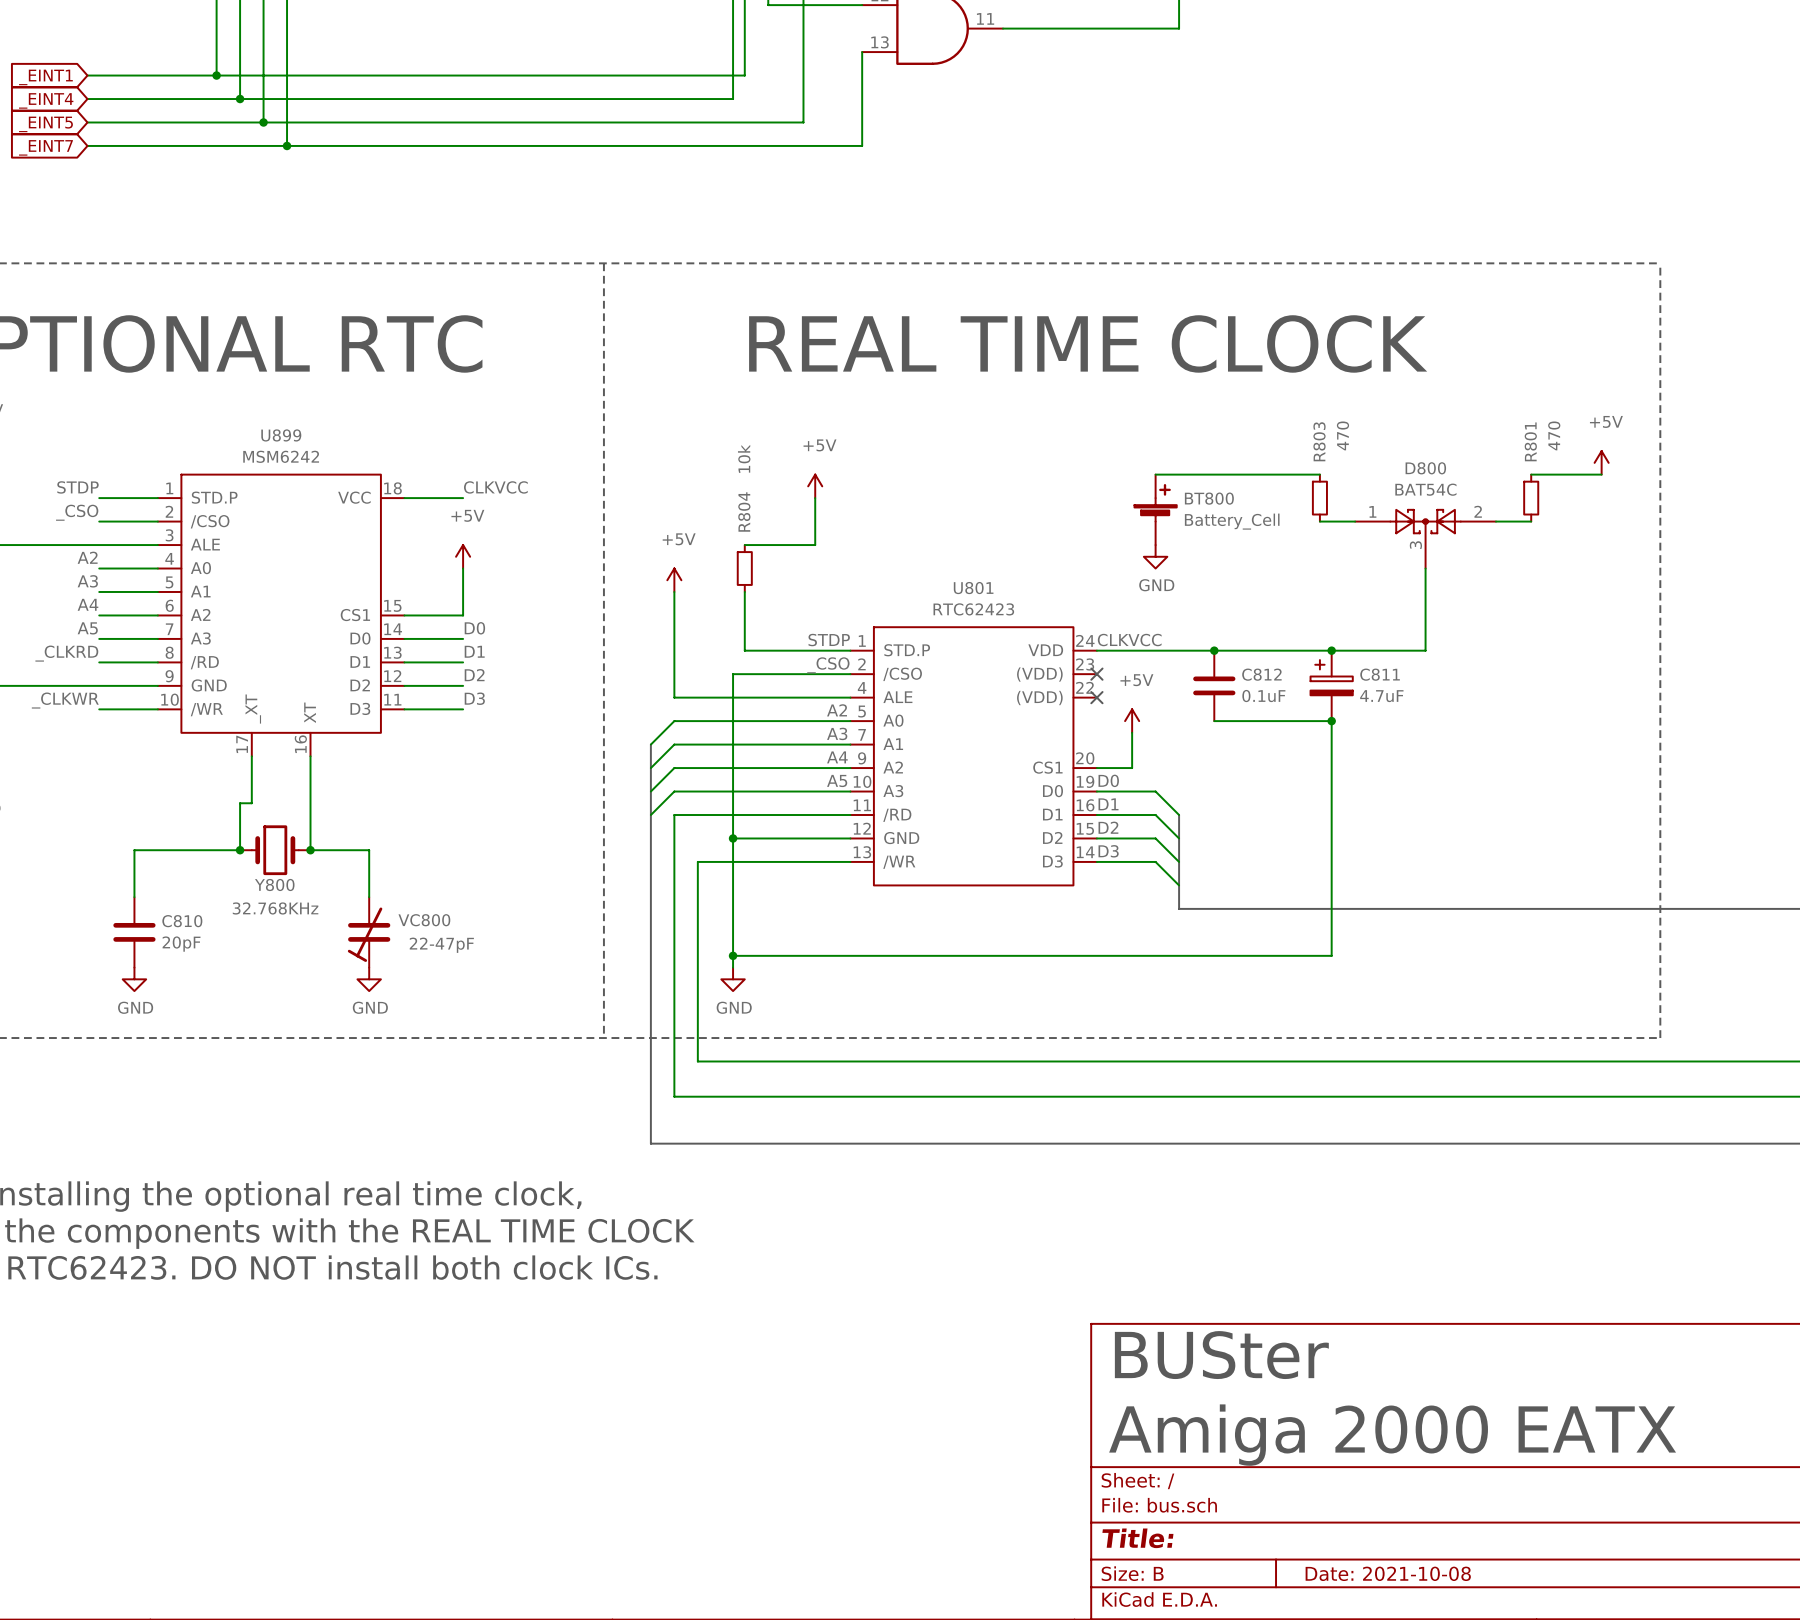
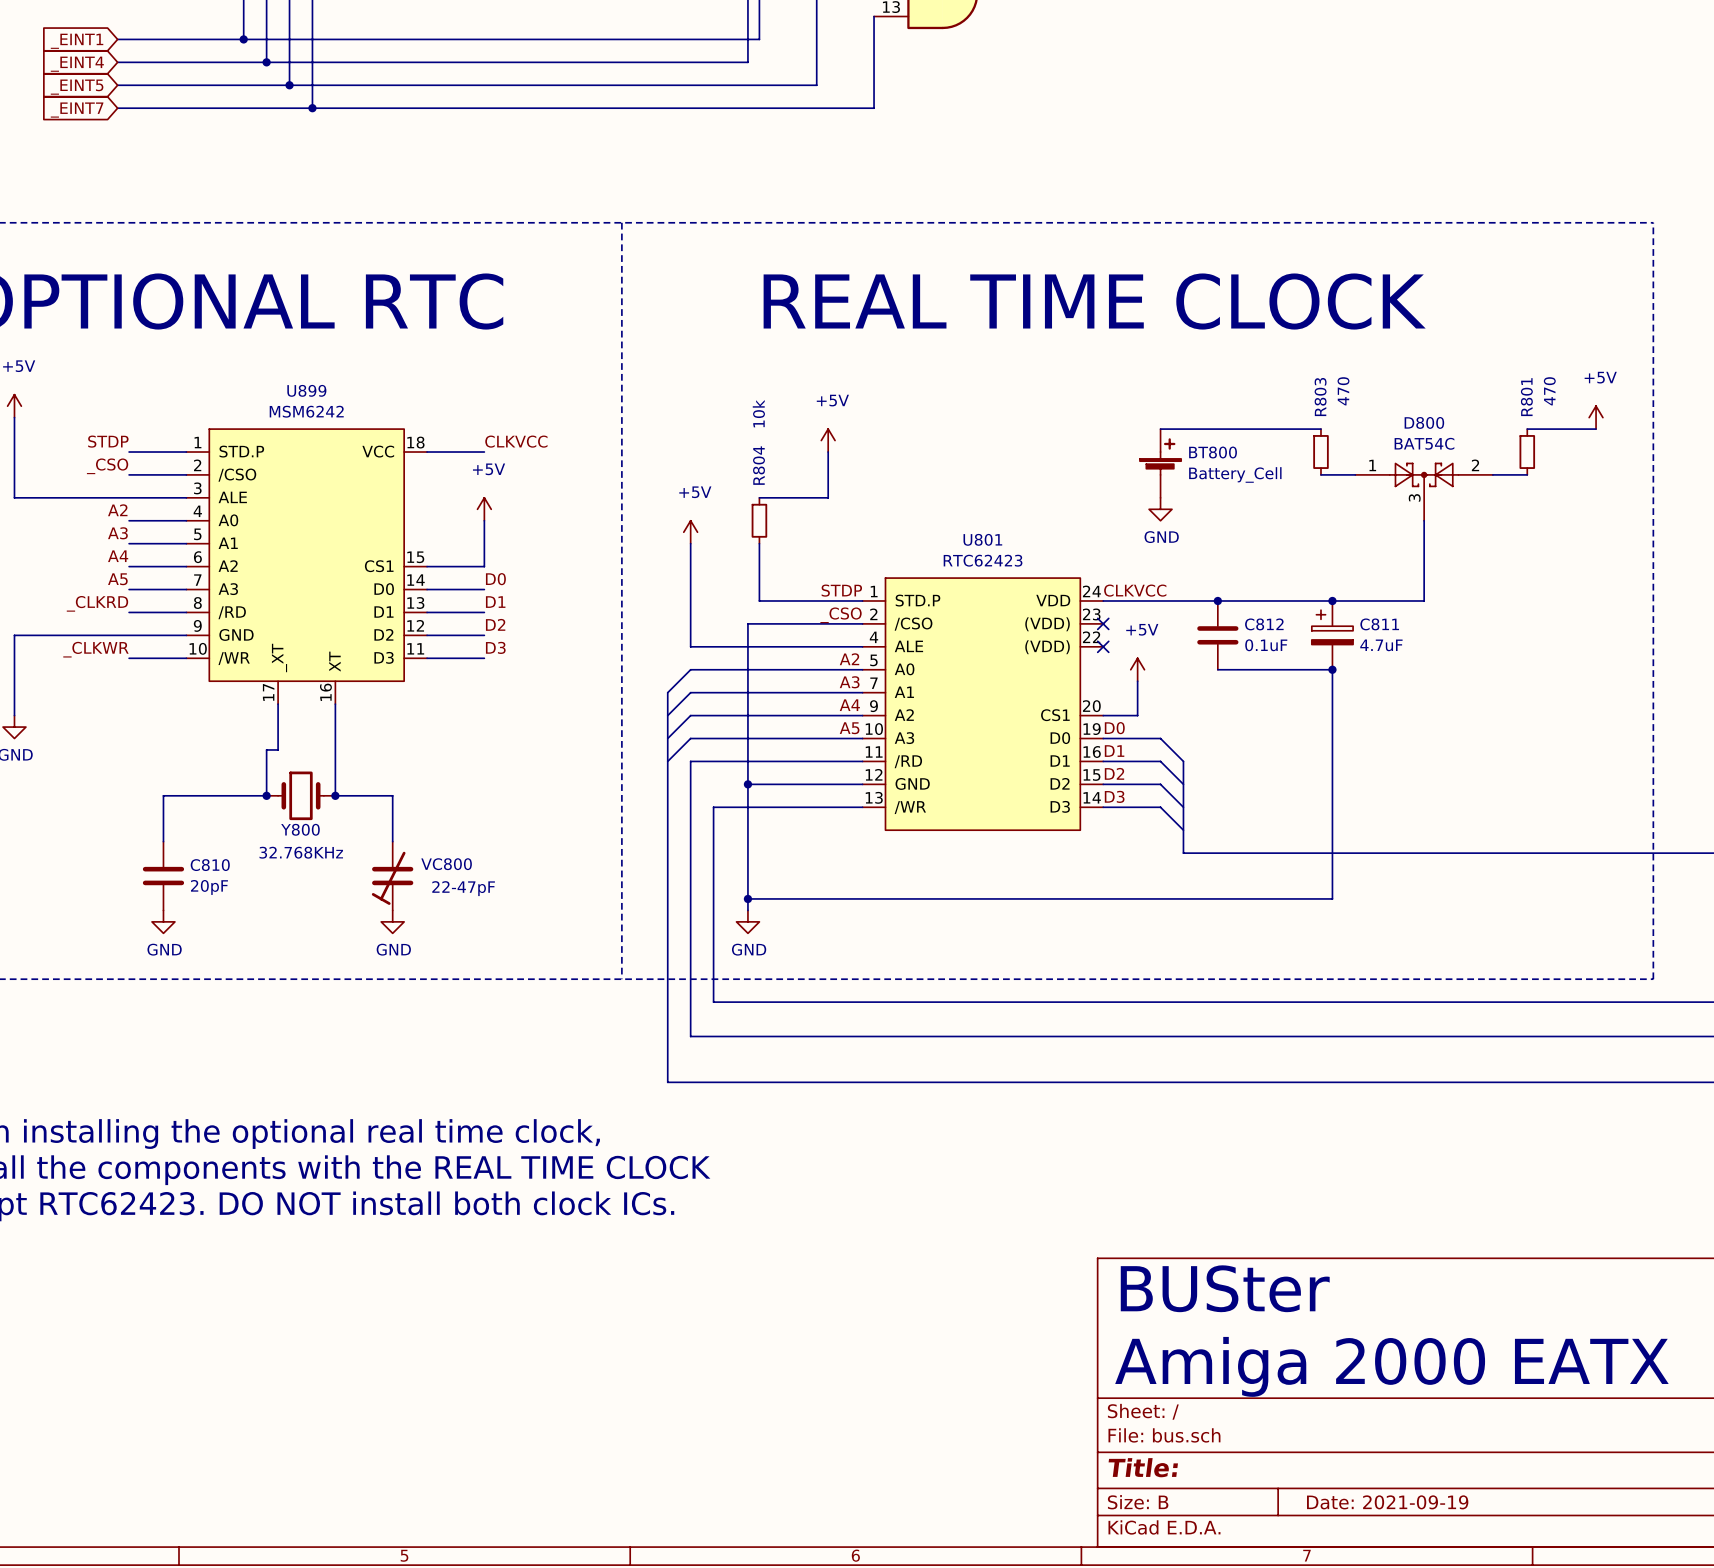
title block: Date: 2021-10-08 (1388, 1573) -> Date: 2021-09-19 (1387, 1502)

